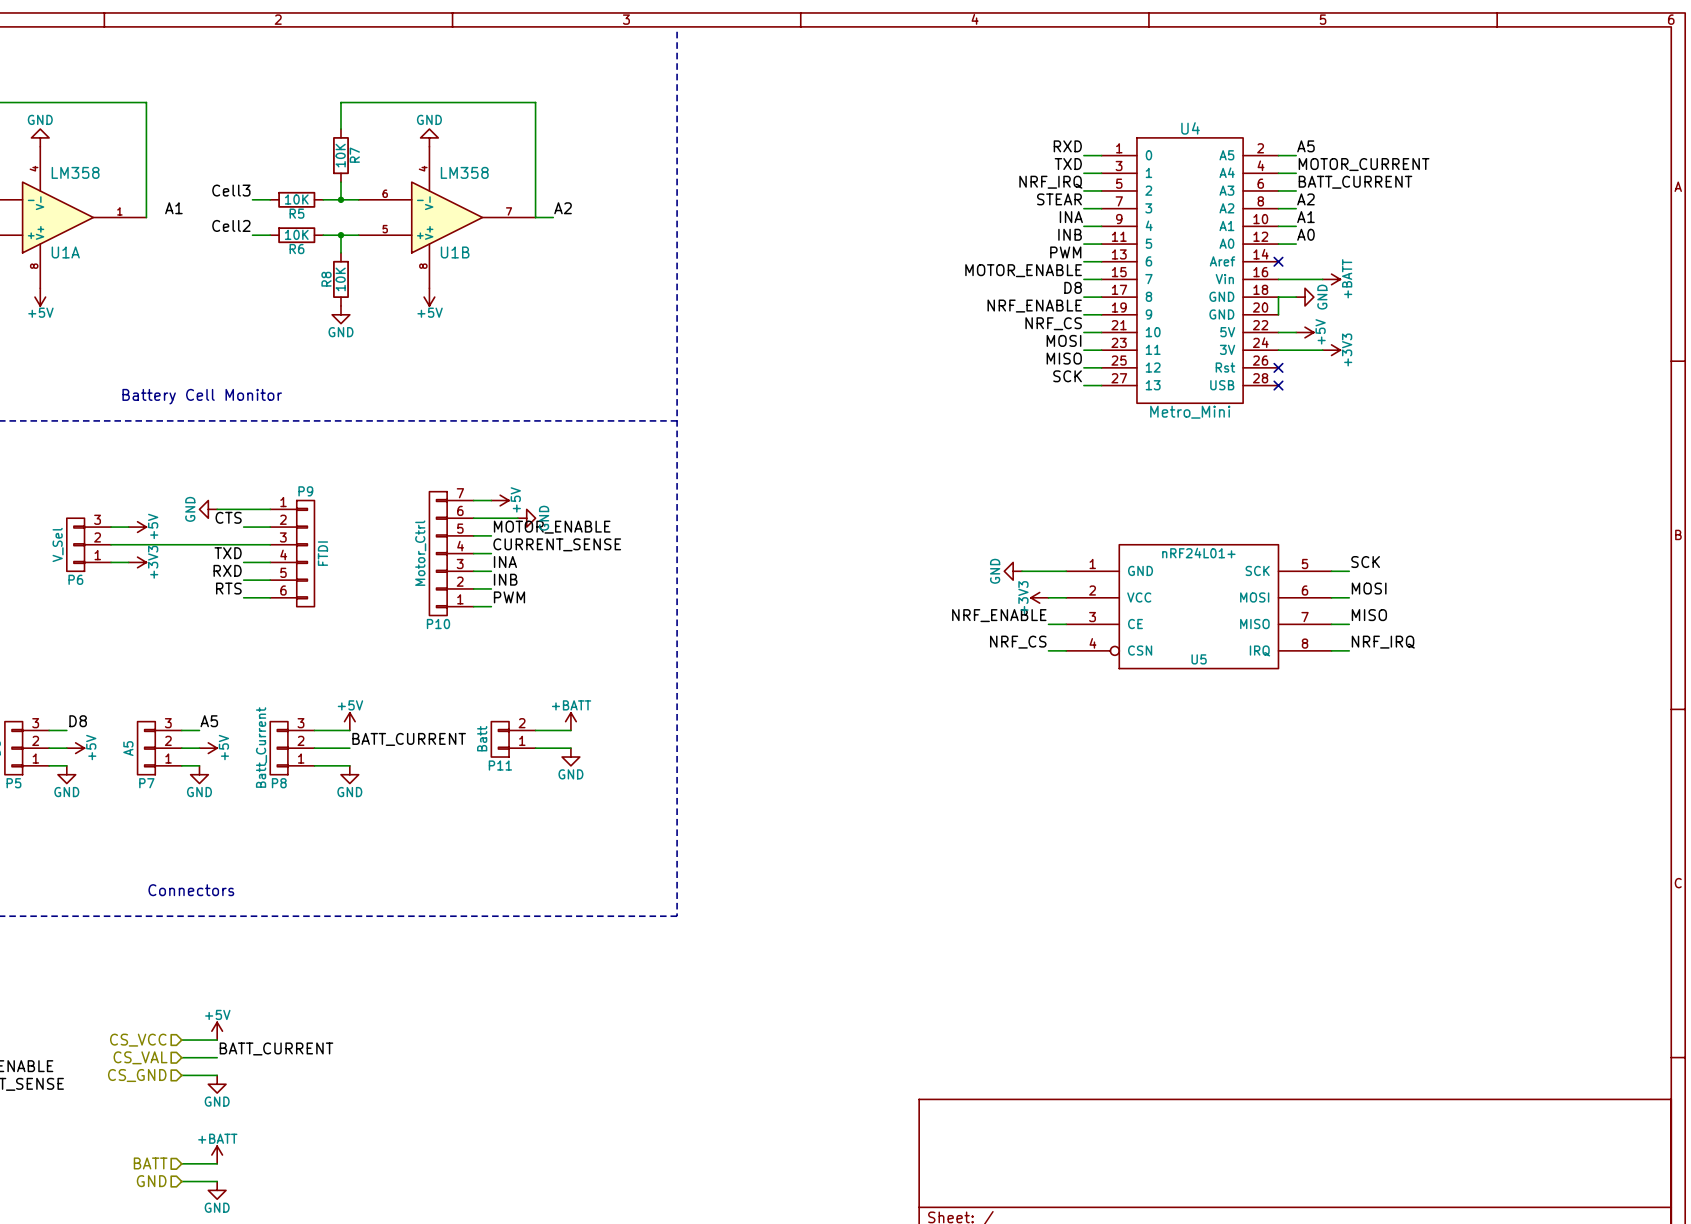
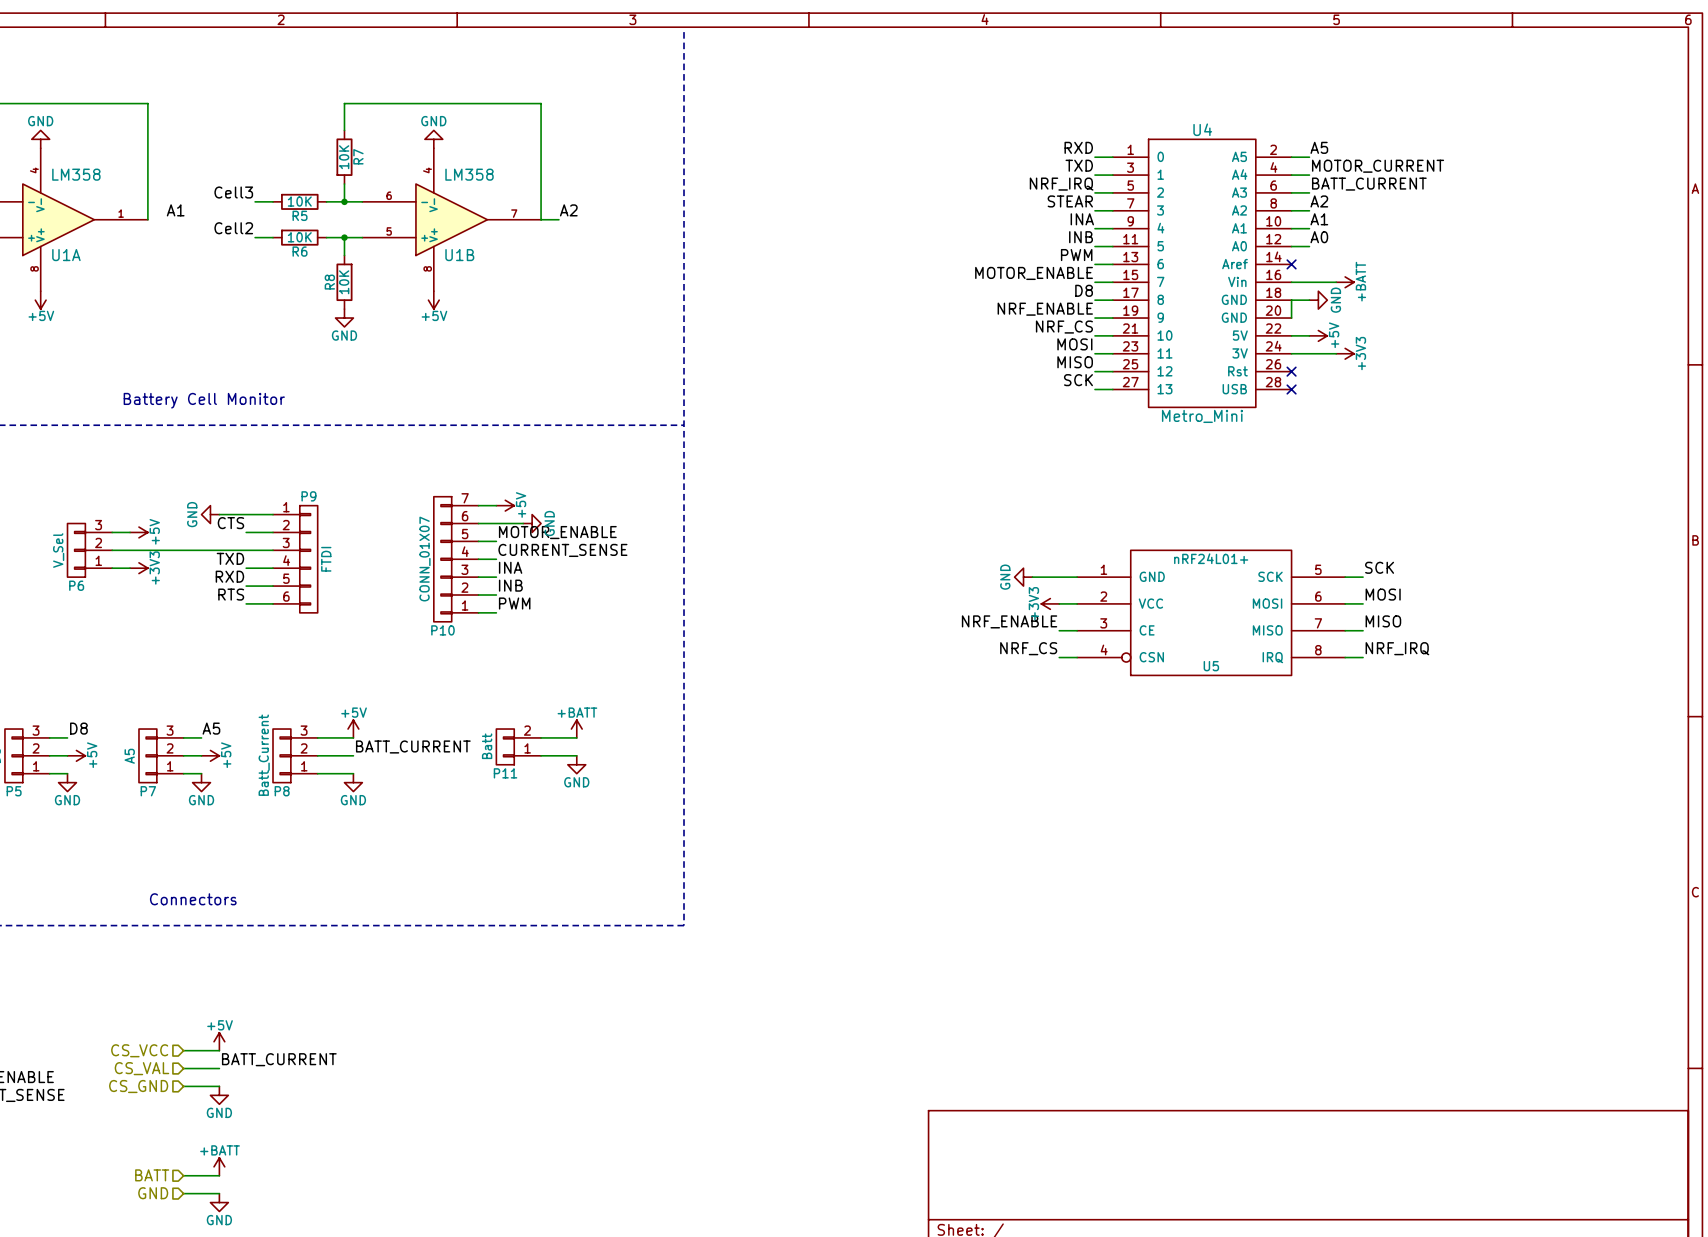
P10 value: Motor_Ctrl (420, 553) -> CONN_01X07 (424, 559)

